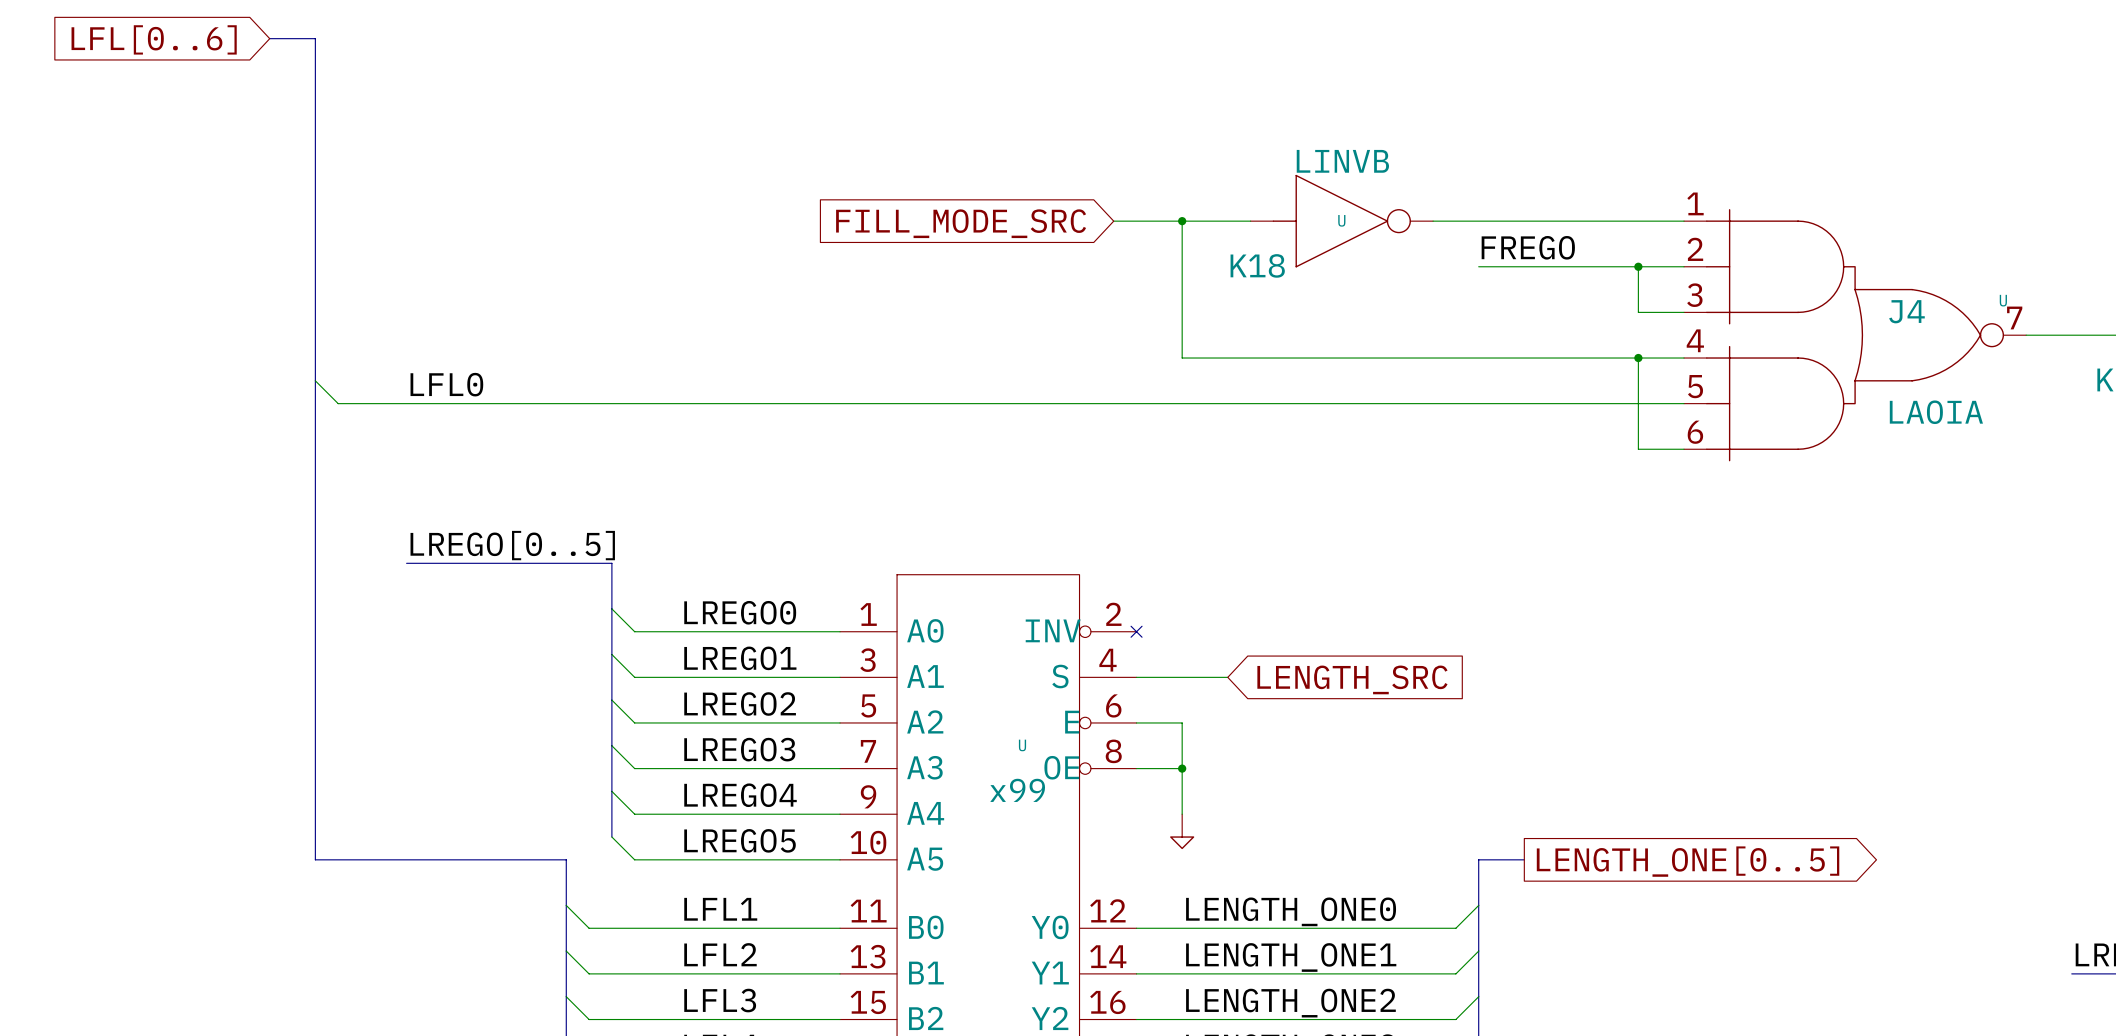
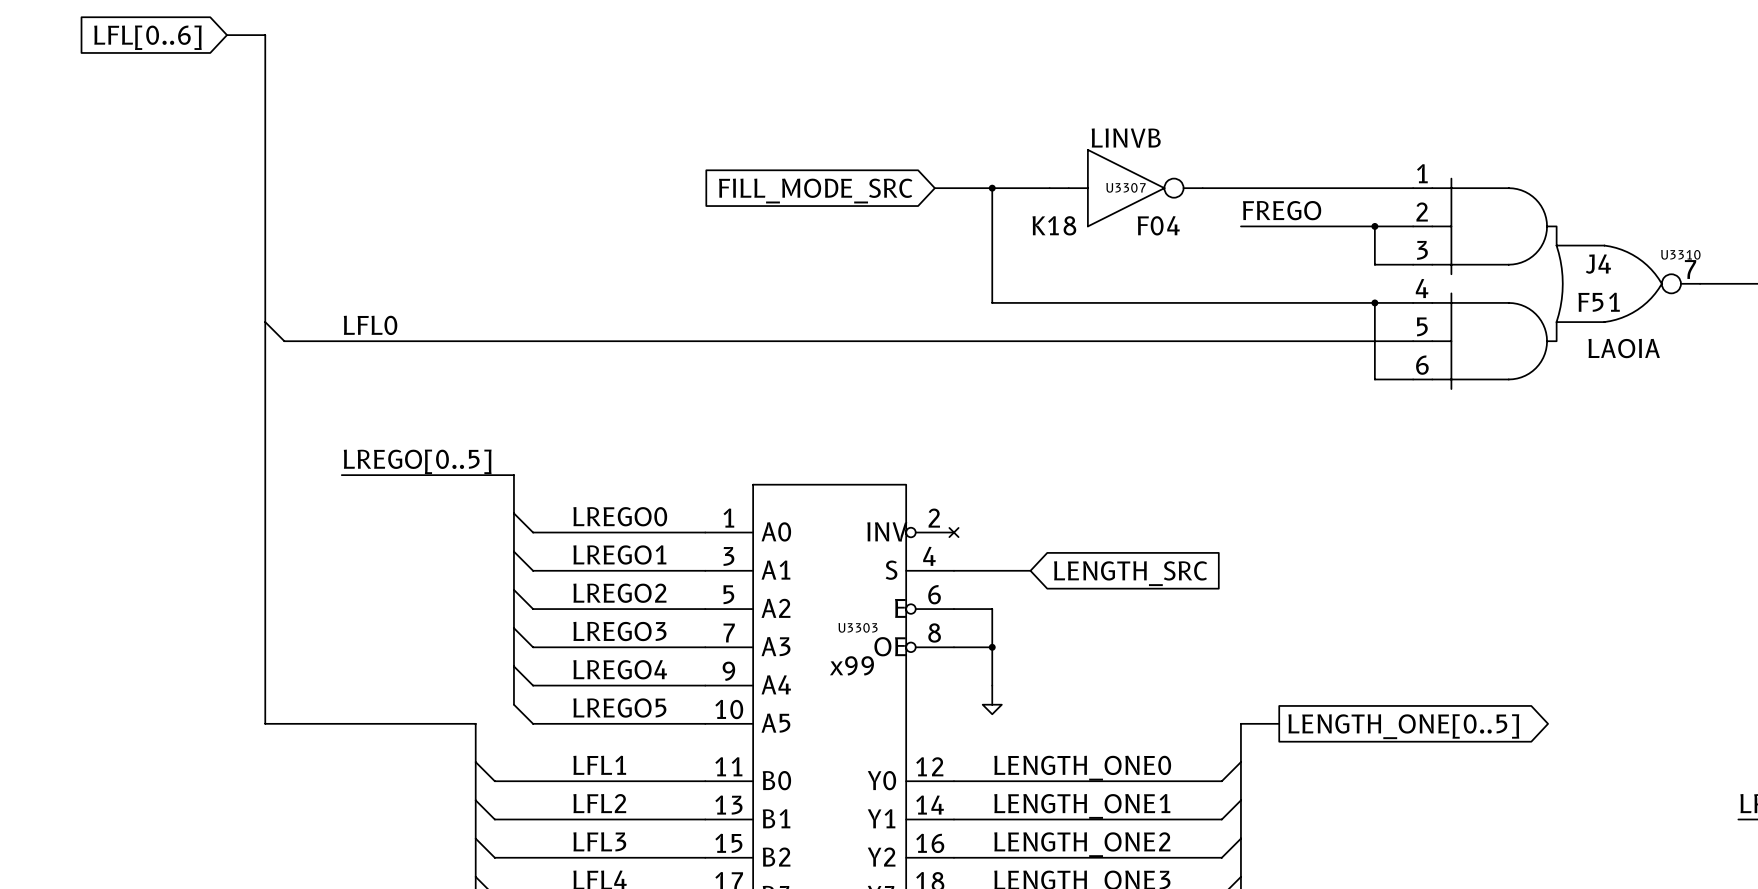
U name: U (1341, 220) -> U3307 (1126, 187)
U value: none -> F04 (1158, 225)
U name: U (2003, 300) -> U3310 (1680, 254)
U value: none -> F51 (1599, 302)
U name: U (1022, 745) -> U3303 (858, 627)

